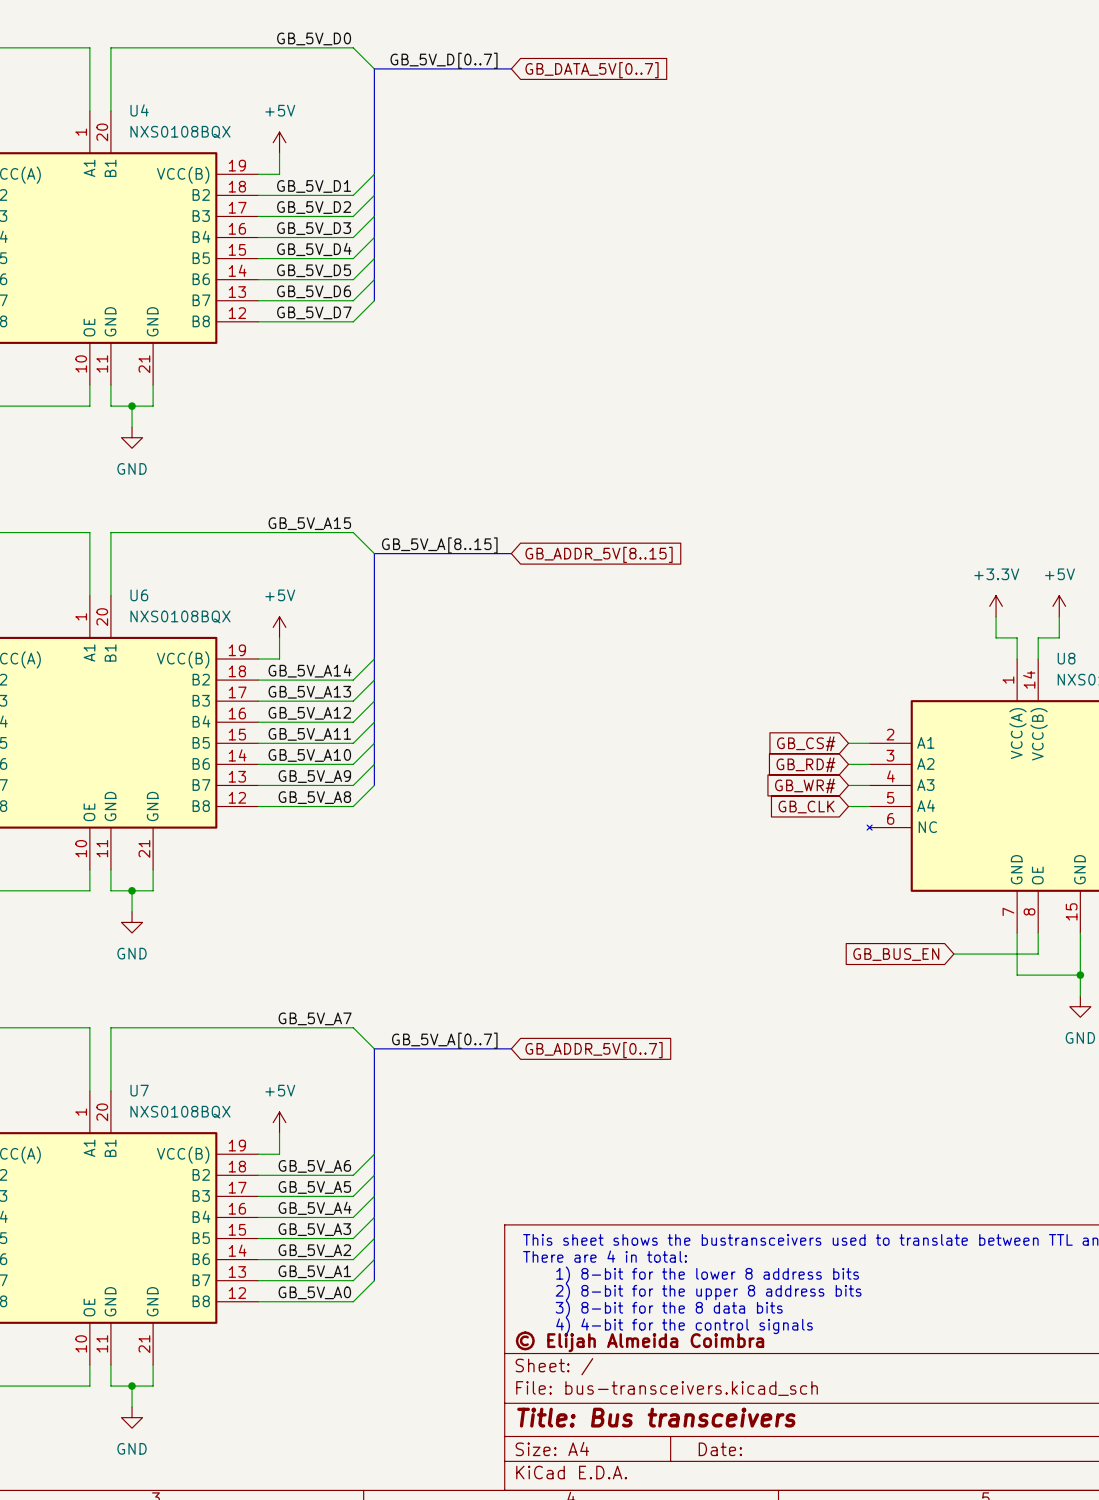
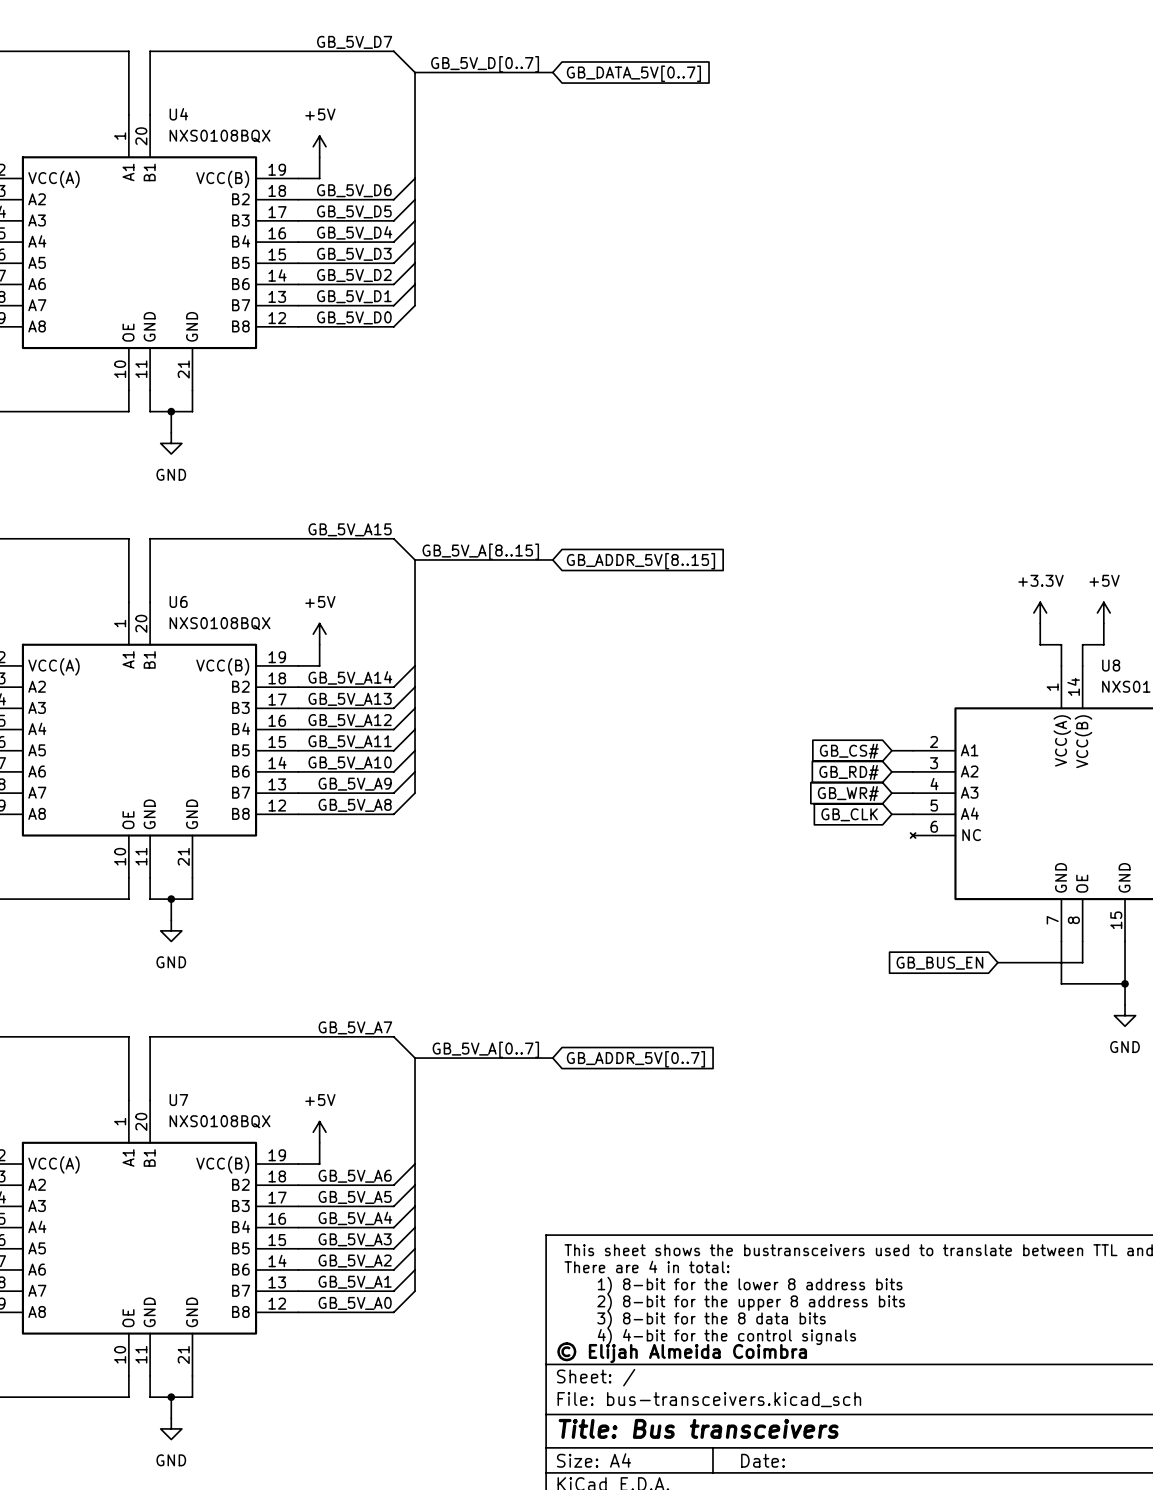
label: GB_5V_D0 (314, 38) -> GB_5V_D7 (354, 42)
label: GB_5V_D1 (314, 186) -> GB_5V_D6 (354, 190)
label: GB_5V_D2 (314, 207) -> GB_5V_D5 (354, 211)
label: GB_5V_D3 (314, 228) -> GB_5V_D4 (354, 232)
label: GB_5V_D4 (314, 249) -> GB_5V_D3 (354, 254)
label: GB_5V_D5 (314, 270) -> GB_5V_D2 (354, 275)
label: GB_5V_D6 (314, 291) -> GB_5V_D1 (354, 296)
label: GB_5V_D7 (314, 312) -> GB_5V_D0 (354, 317)

